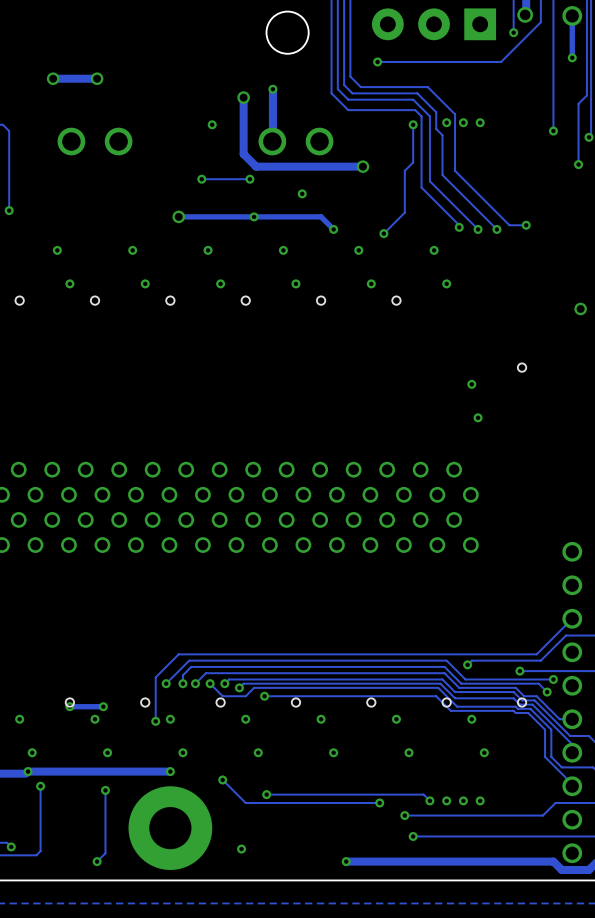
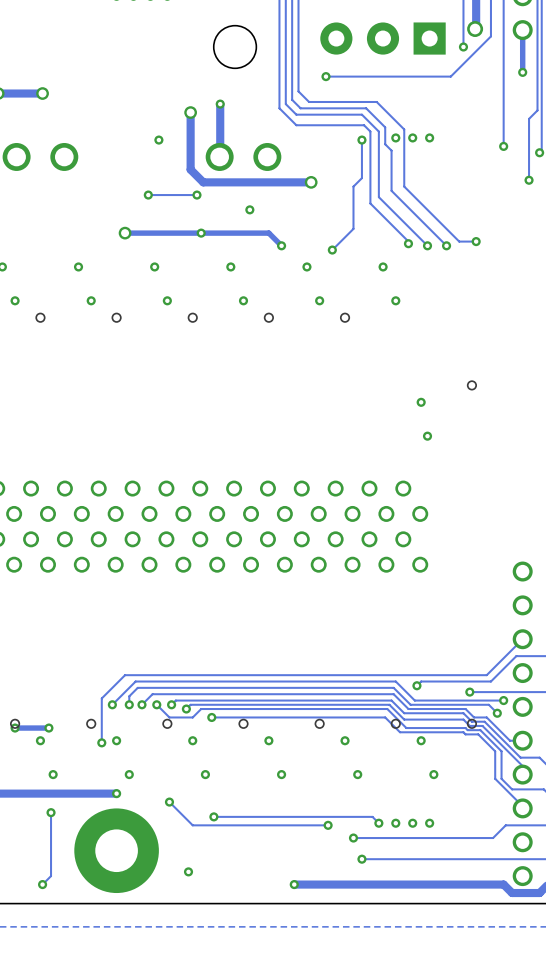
via: (580, 308) -> none

